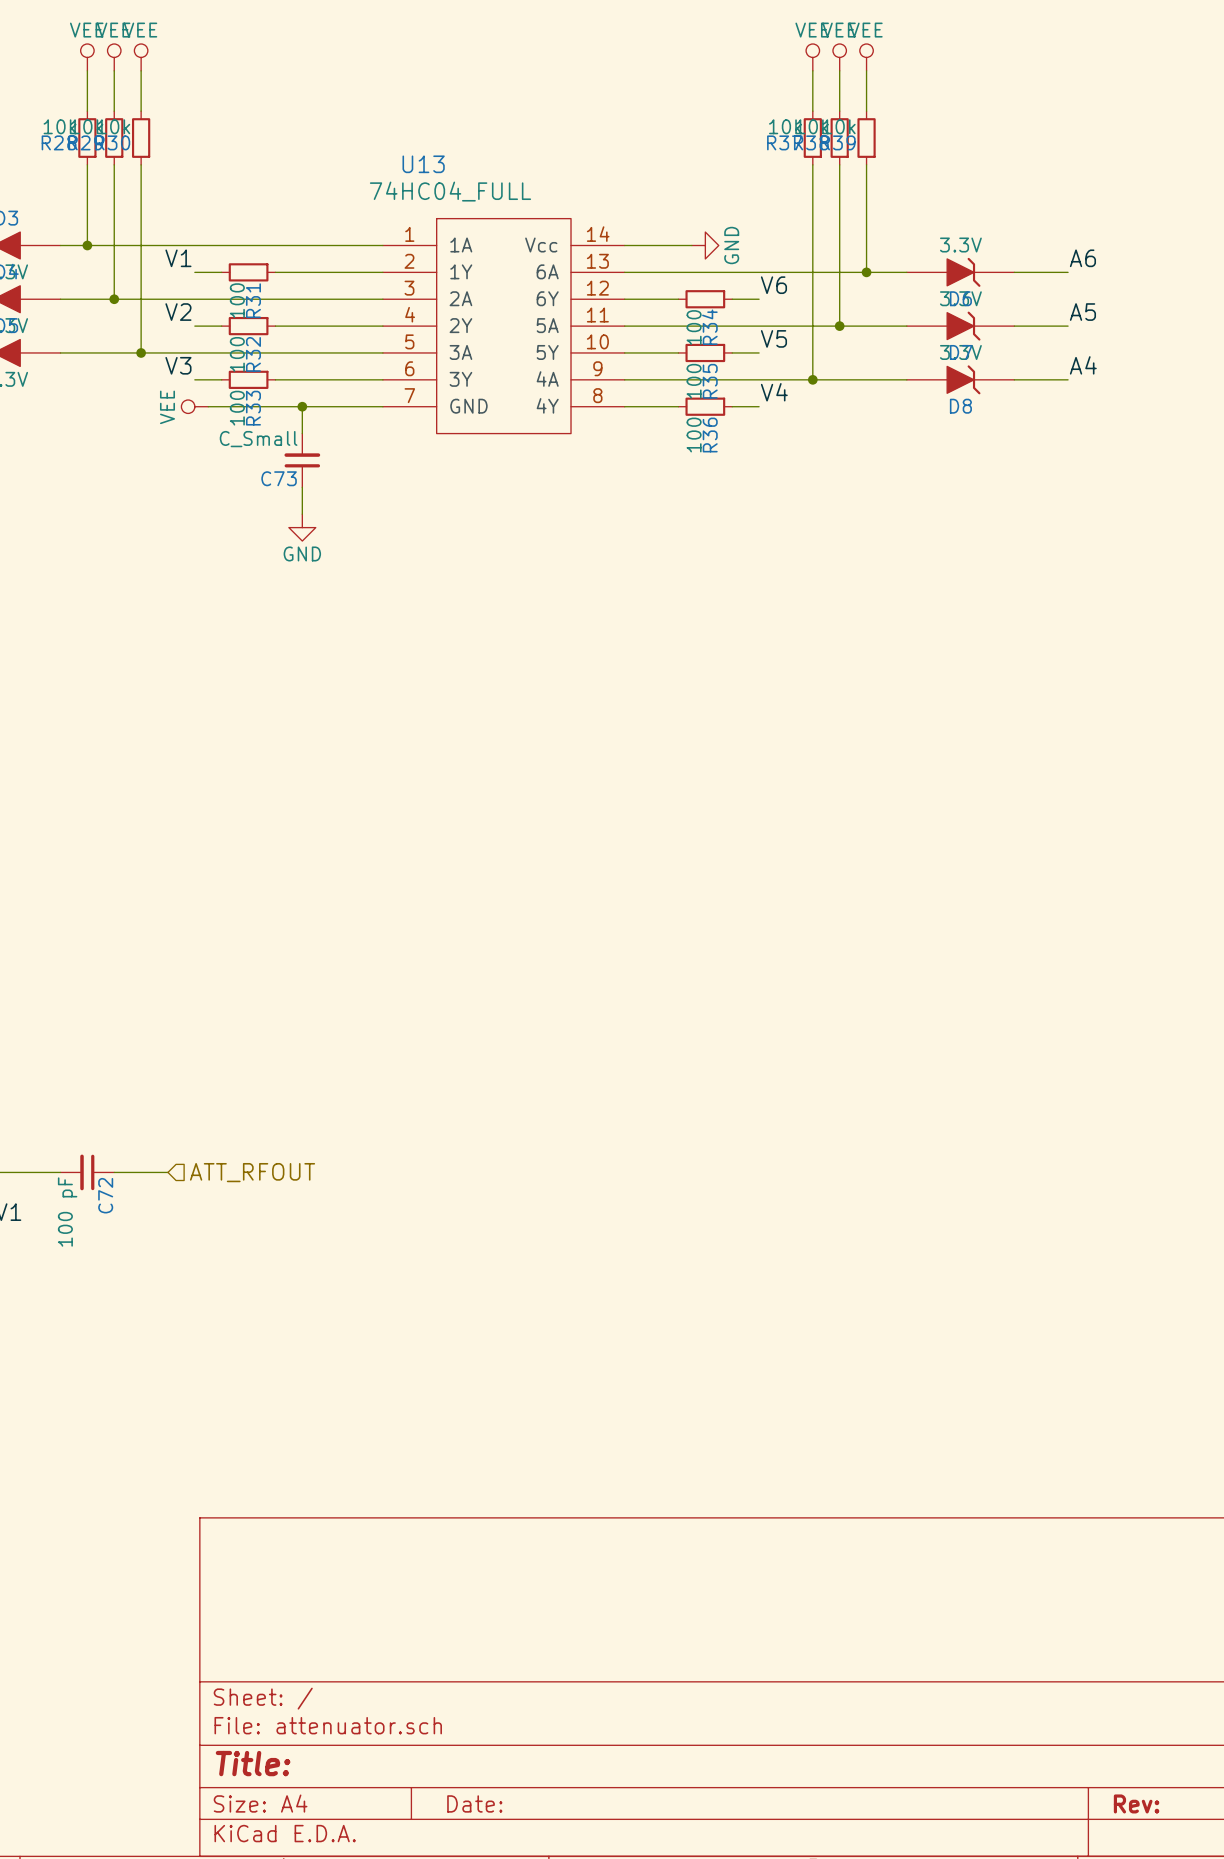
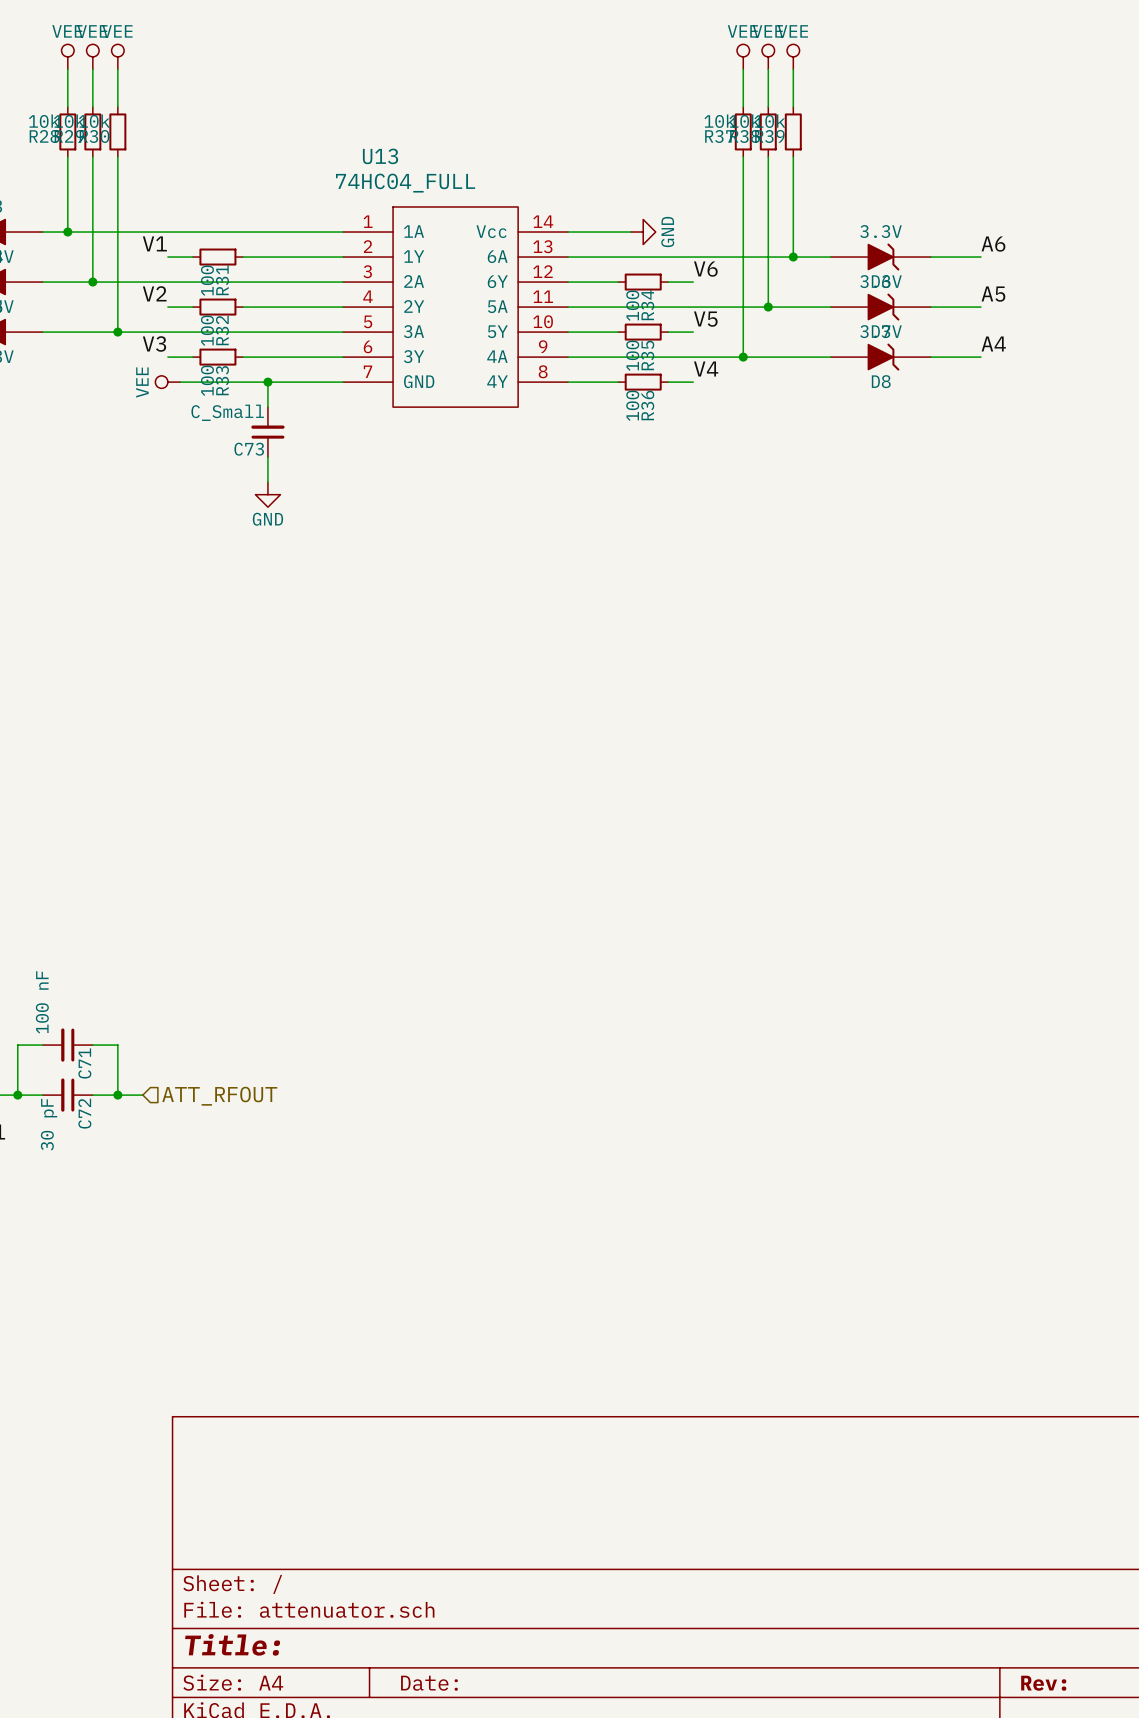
wire: none -> (42, 1045) (17, 1045) (17, 1095)
C71: none -> 100 nF (67, 1045)
wire: none -> (92, 1045) (117, 1045) (117, 1095)
junction: none -> (17, 1095)
junction: none -> (117, 1095)
C72 value: 100 pF (67, 1212) -> 30 pF (49, 1124)

